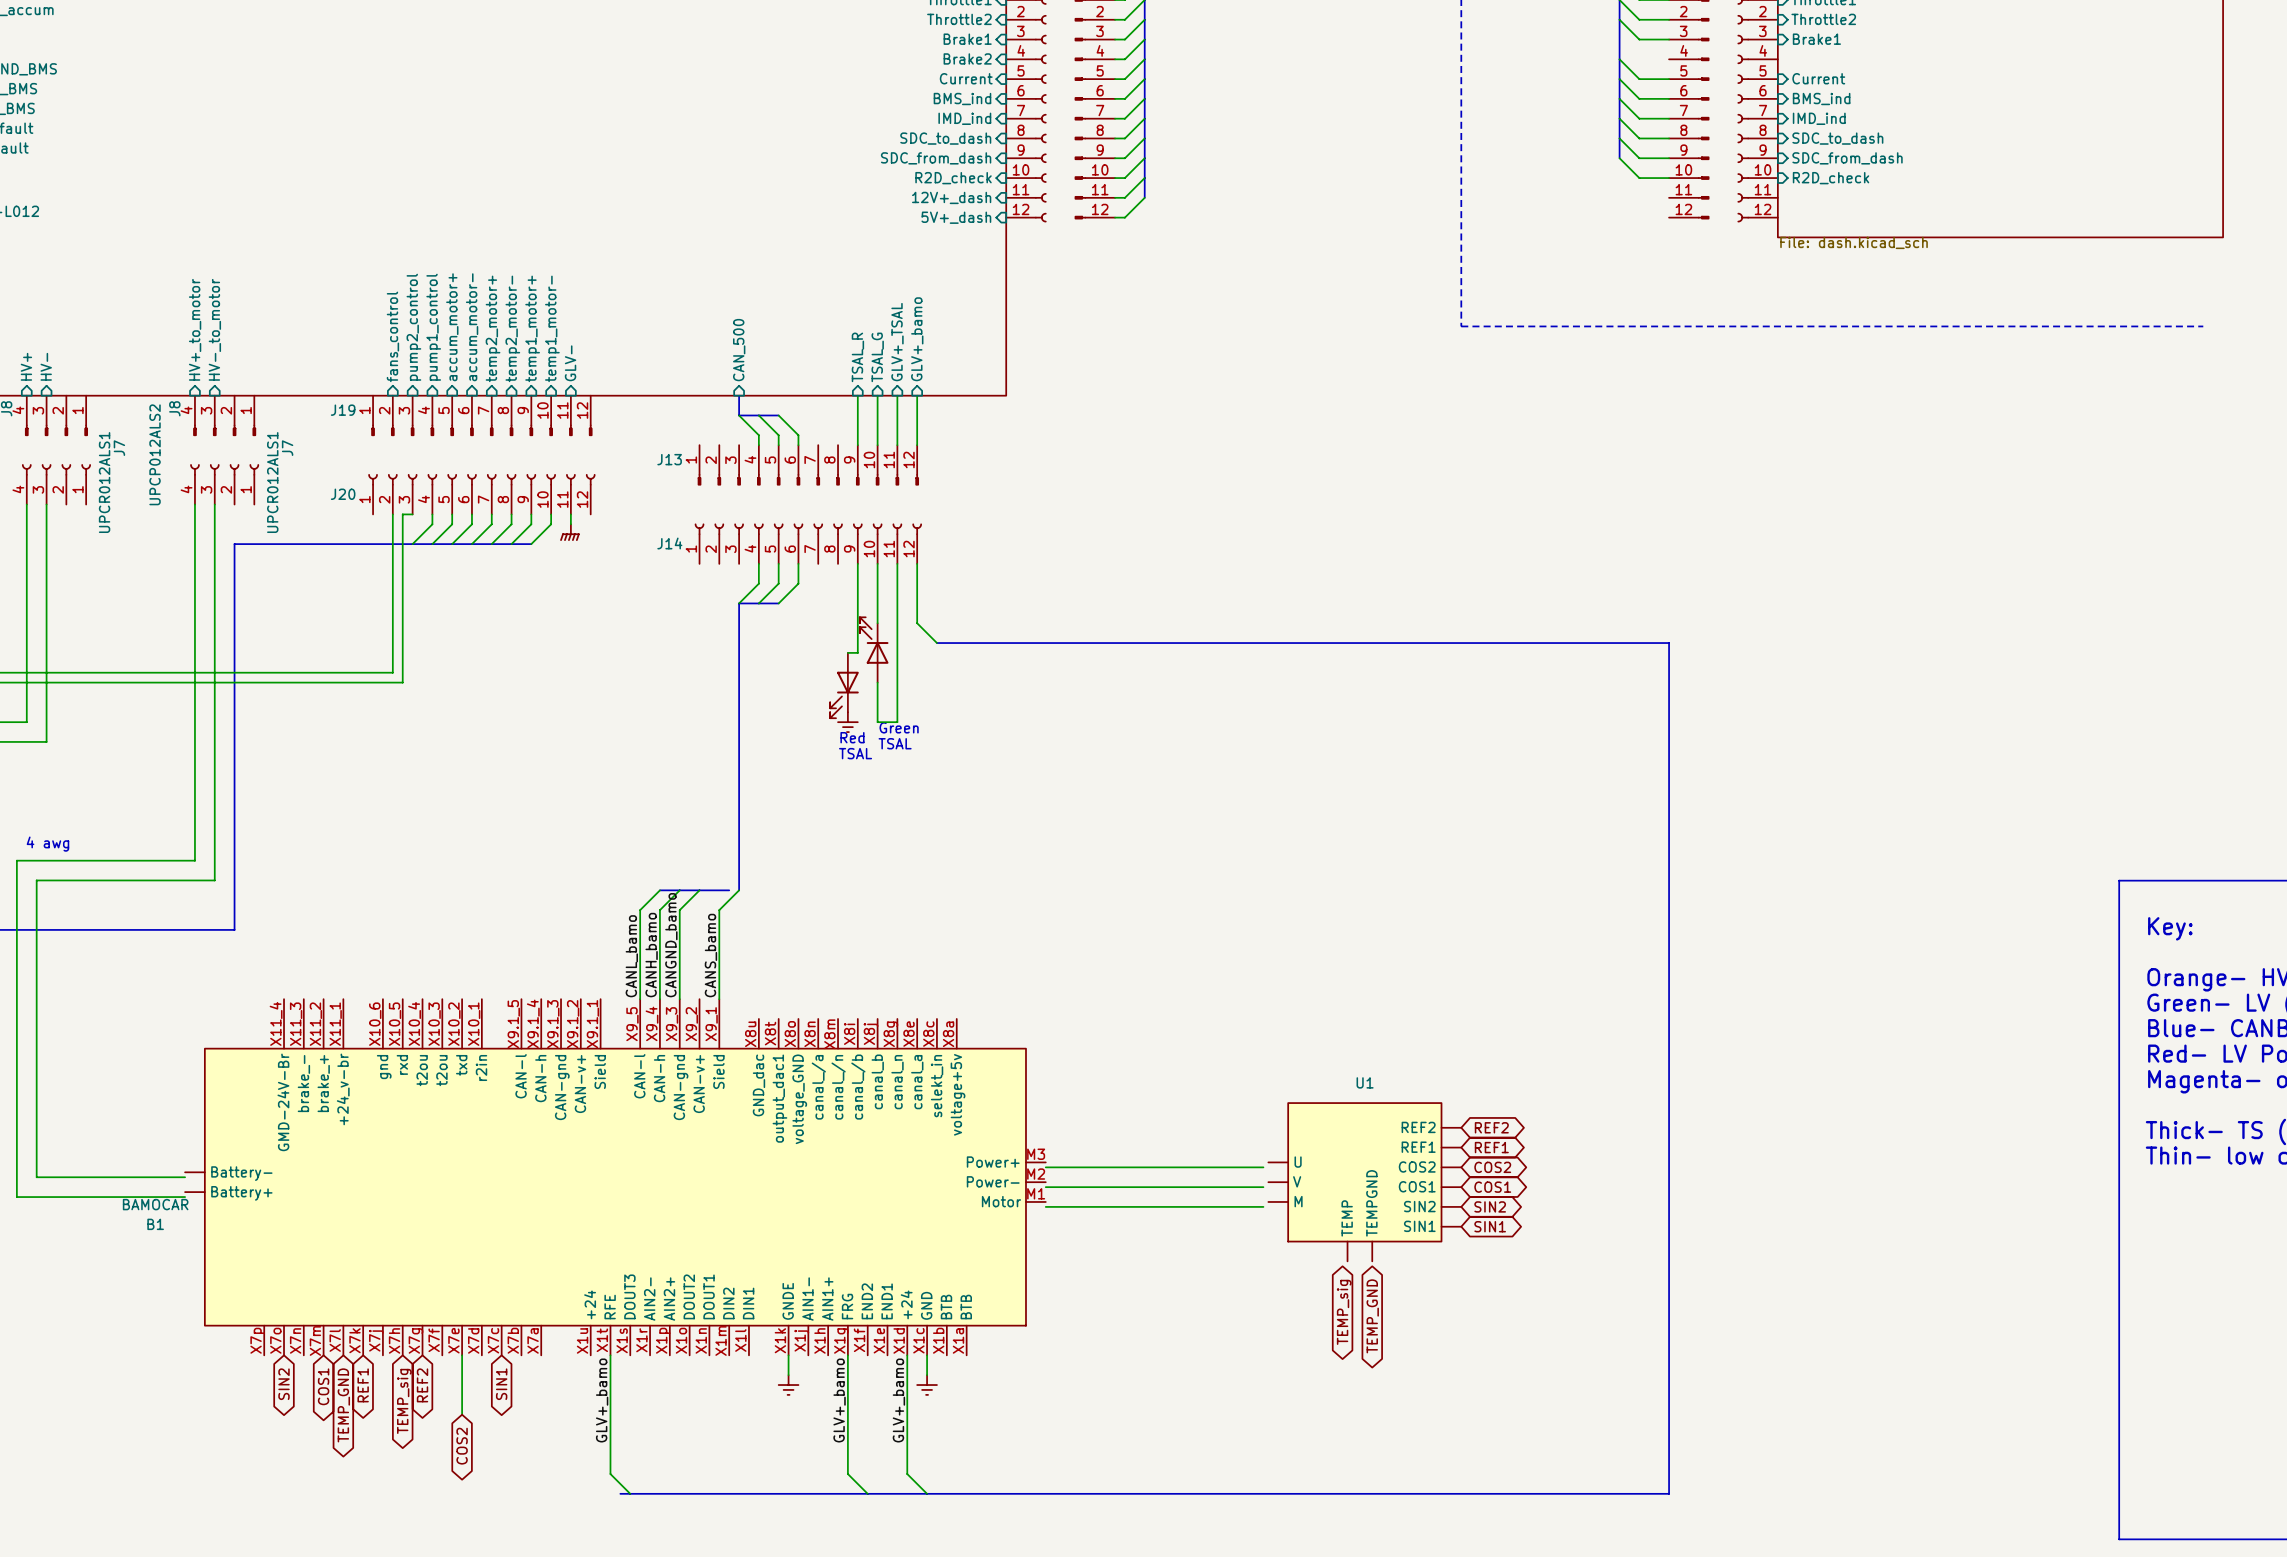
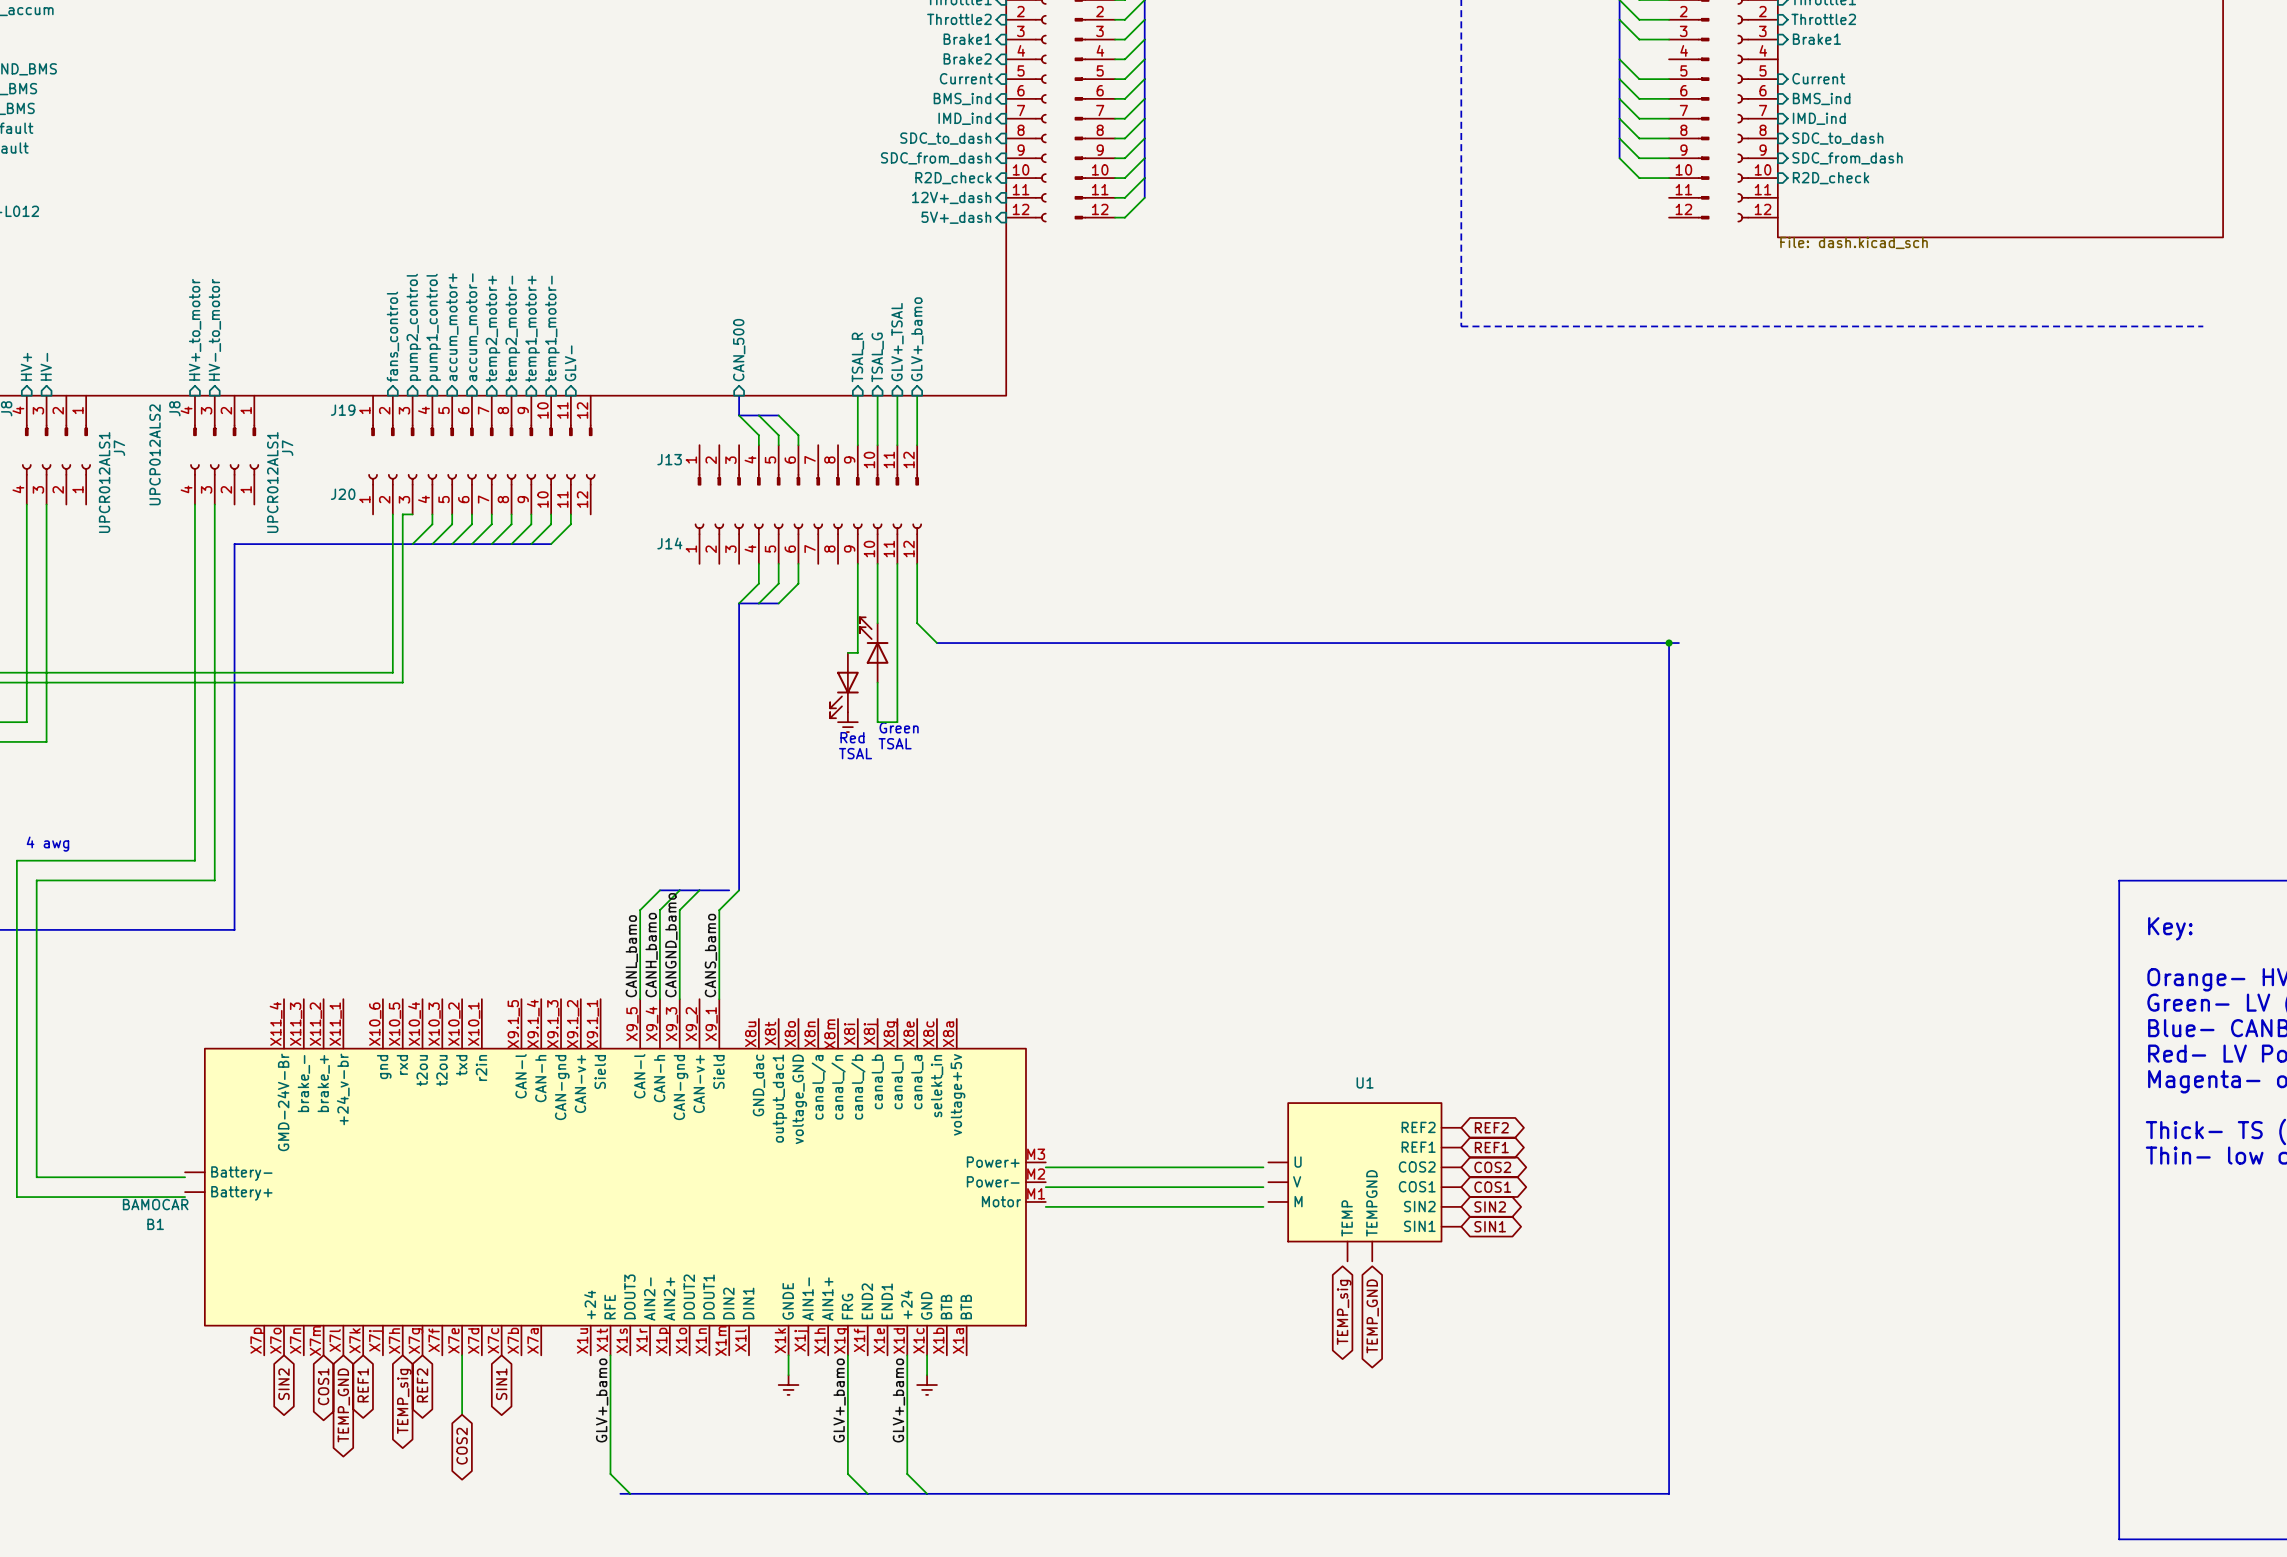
wire: none -> (570, 524) (551, 544)
power symbol: (569, 532) -> none
bus: none -> (531, 544) (551, 544)
bus: none -> (1669, 643) (1678, 643)
junction: none -> (1669, 643)

